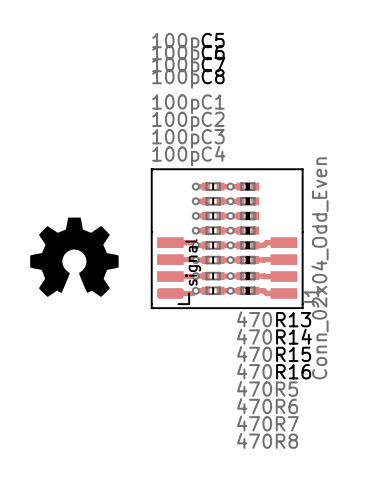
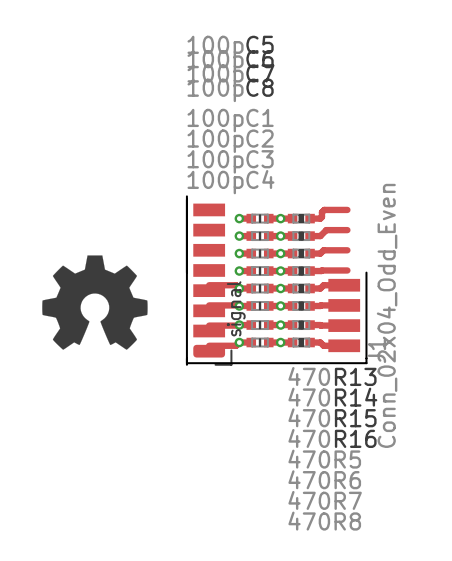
board edge: (151, 170) (302, 169) (302, 232) -> none
track: none -> (347, 209) (324, 209) (320, 218) (310, 218)
track: none -> (347, 230) (326, 230) (320, 236) (310, 236)
track: none -> (347, 250) (323, 250) (320, 253) (310, 253)
track: none -> (347, 270) (310, 271)
part: none -> (209, 280)
part: (170, 268) -> none

